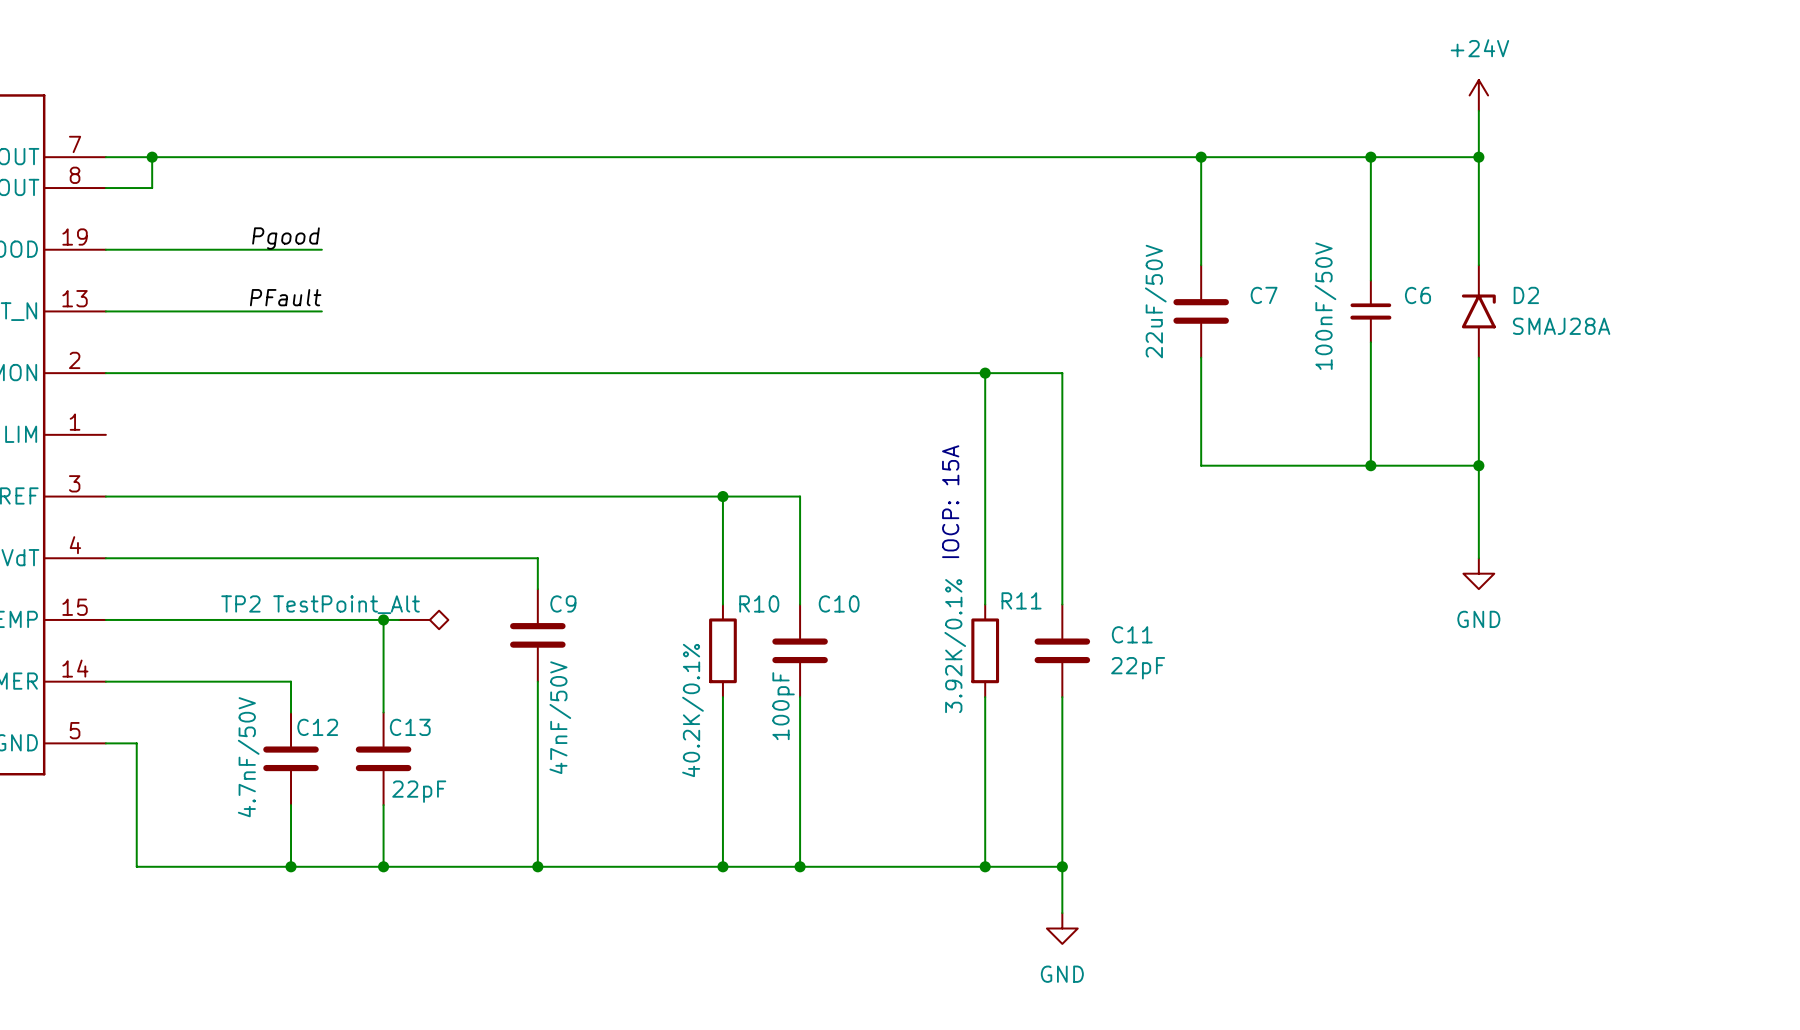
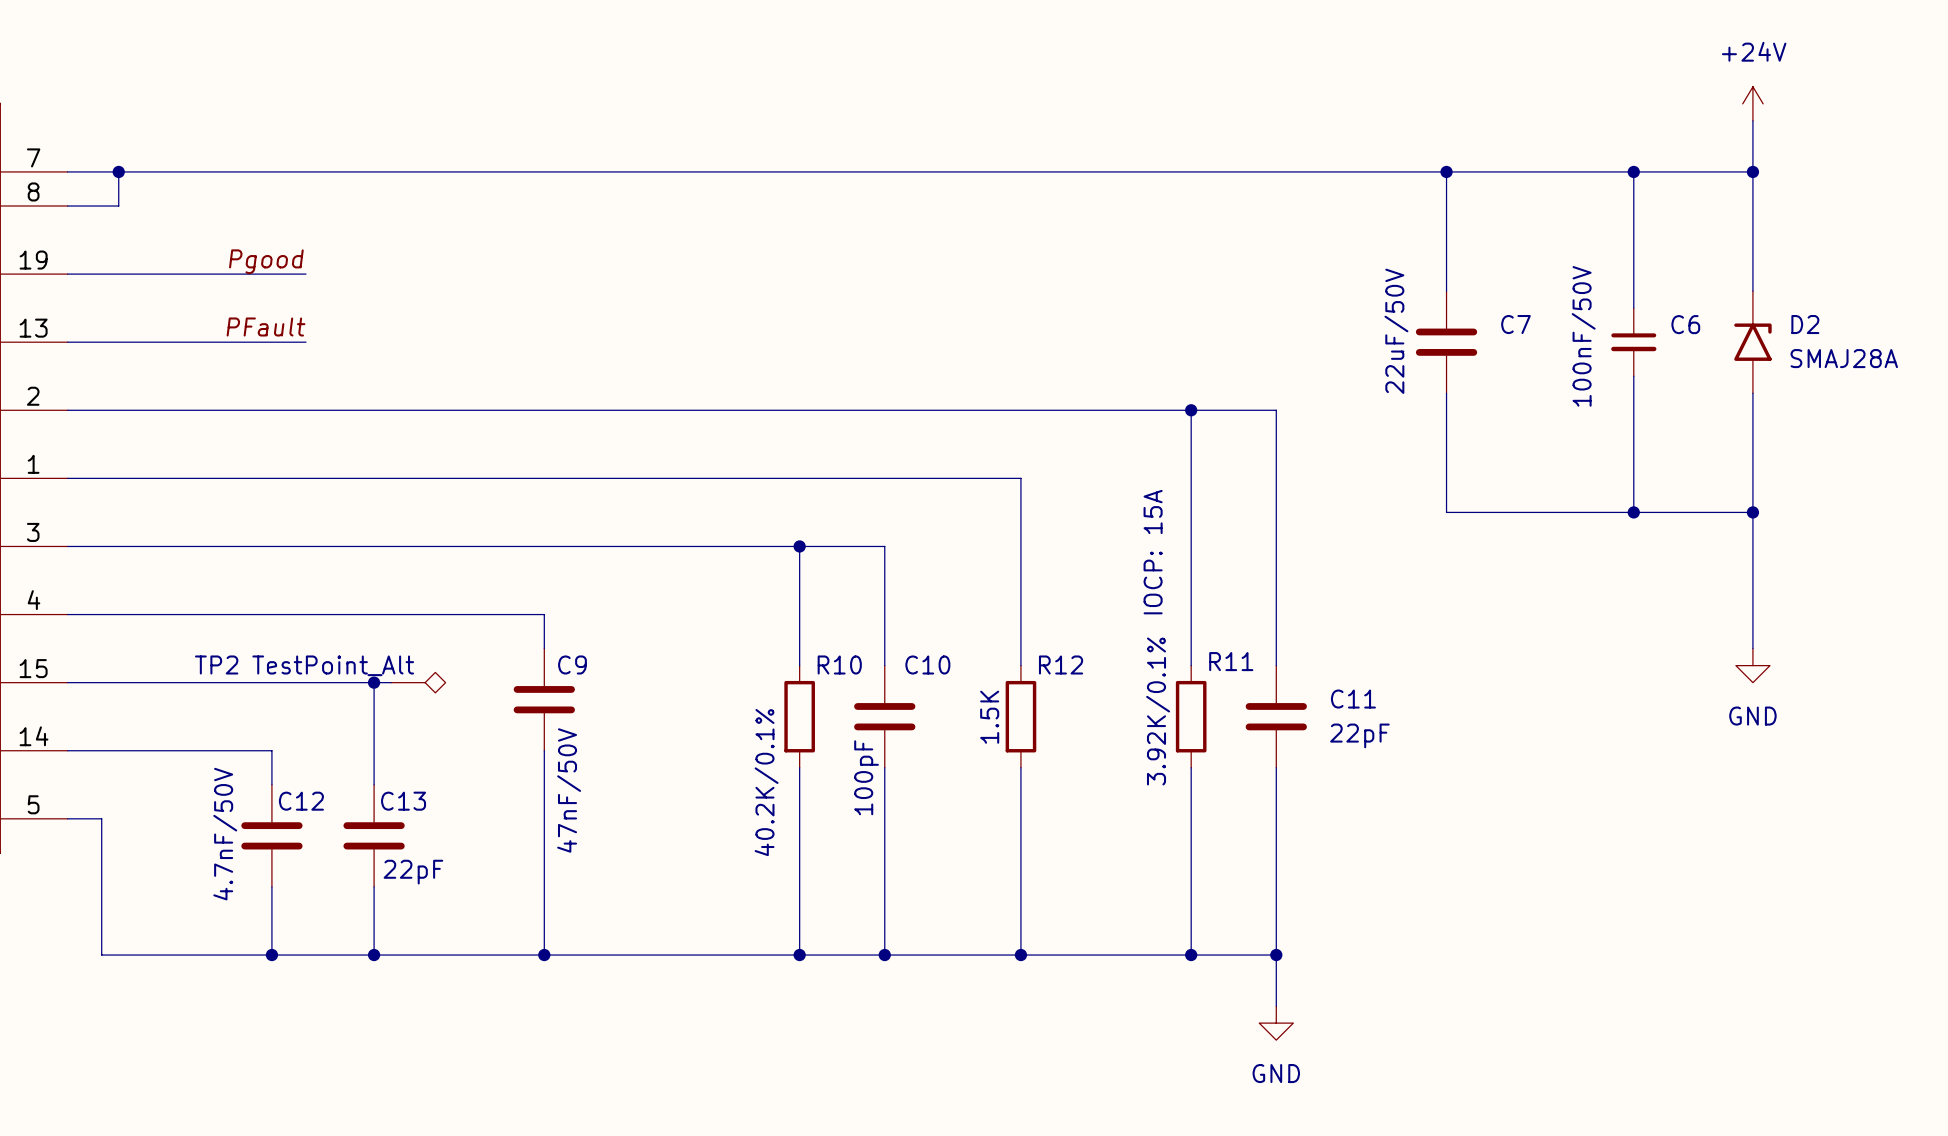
power symbol position: +24V (1478, 95) -> +24V (1752, 103)
wire: (1478, 110) (1478, 265) -> (1752, 120) (1752, 291)
wire: (1201, 157) (1201, 265) -> (1446, 171) (1446, 291)
junction: (1201, 157) -> none
wire: (1370, 157) (1370, 280) -> (1633, 171) (1633, 308)
junction position: (1370, 157) -> (1446, 171)
wire: none -> (1582, 171) (1752, 171)
junction position: (1478, 157) -> (1633, 171)
junction: none -> (1752, 171)
C7 position: (1201, 311) -> (1446, 342)
C6 position: (1370, 311) -> (1633, 342)
D2 position: (1478, 311) -> (1752, 342)
wire: (1370, 342) (1370, 465) -> (1633, 376) (1633, 512)
wire: (1201, 357) (1201, 373) -> (1123, 410) (1276, 410)
wire: (1478, 357) (1478, 558) -> none
wire: none -> (1752, 393) (1752, 648)
wire: (985, 373) (985, 604) -> (1191, 410) (1191, 665)
junction: (985, 373) -> none
wire: (1062, 373) (1062, 604) -> none
junction: none -> (1191, 410)
wire: none -> (67, 478) (1020, 478) (1020, 665)
wire: (1201, 465) (1355, 465) -> (1446, 393) (1446, 512)
wire: none -> (1276, 512) (1276, 665)
junction: (1370, 465) -> none
wire: none -> (1582, 512) (1752, 512)
junction position: (1478, 465) -> (1633, 512)
junction: none -> (1752, 512)
wire: (722, 496) (722, 604) -> (799, 546) (799, 665)
junction position: (722, 496) -> (799, 546)
wire: (800, 496) (800, 604) -> (833, 546) (884, 546) (884, 665)
text position: IOCP: 15A (950, 501) -> IOCP: 15A (1153, 552)
power symbol position: GND (1478, 573) -> GND (1752, 665)
R10 position: (722, 650) -> (799, 716)
C10 position: (800, 650) -> (884, 716)
R12: none -> 1.5K (1020, 716)
R11 position: (985, 650) -> (1191, 716)
C11 position: (1062, 650) -> (1276, 716)
wire: (722, 697) (722, 866) -> (799, 767) (799, 955)
wire: (800, 697) (800, 866) -> (884, 767) (884, 955)
wire: none -> (1020, 767) (1020, 955)
wire: (985, 697) (985, 866) -> (1191, 767) (1191, 955)
wire: (1062, 697) (1062, 913) -> (1276, 767) (1276, 1006)
junction: (722, 866) -> none
junction: none -> (799, 955)
junction: (800, 866) -> none
junction: none -> (884, 955)
junction position: (985, 866) -> (1020, 955)
wire: none -> (1123, 955) (1276, 955)
junction: (1062, 866) -> none
junction: none -> (1191, 955)
junction: none -> (1276, 955)
power symbol position: GND (1062, 928) -> GND (1276, 1023)

